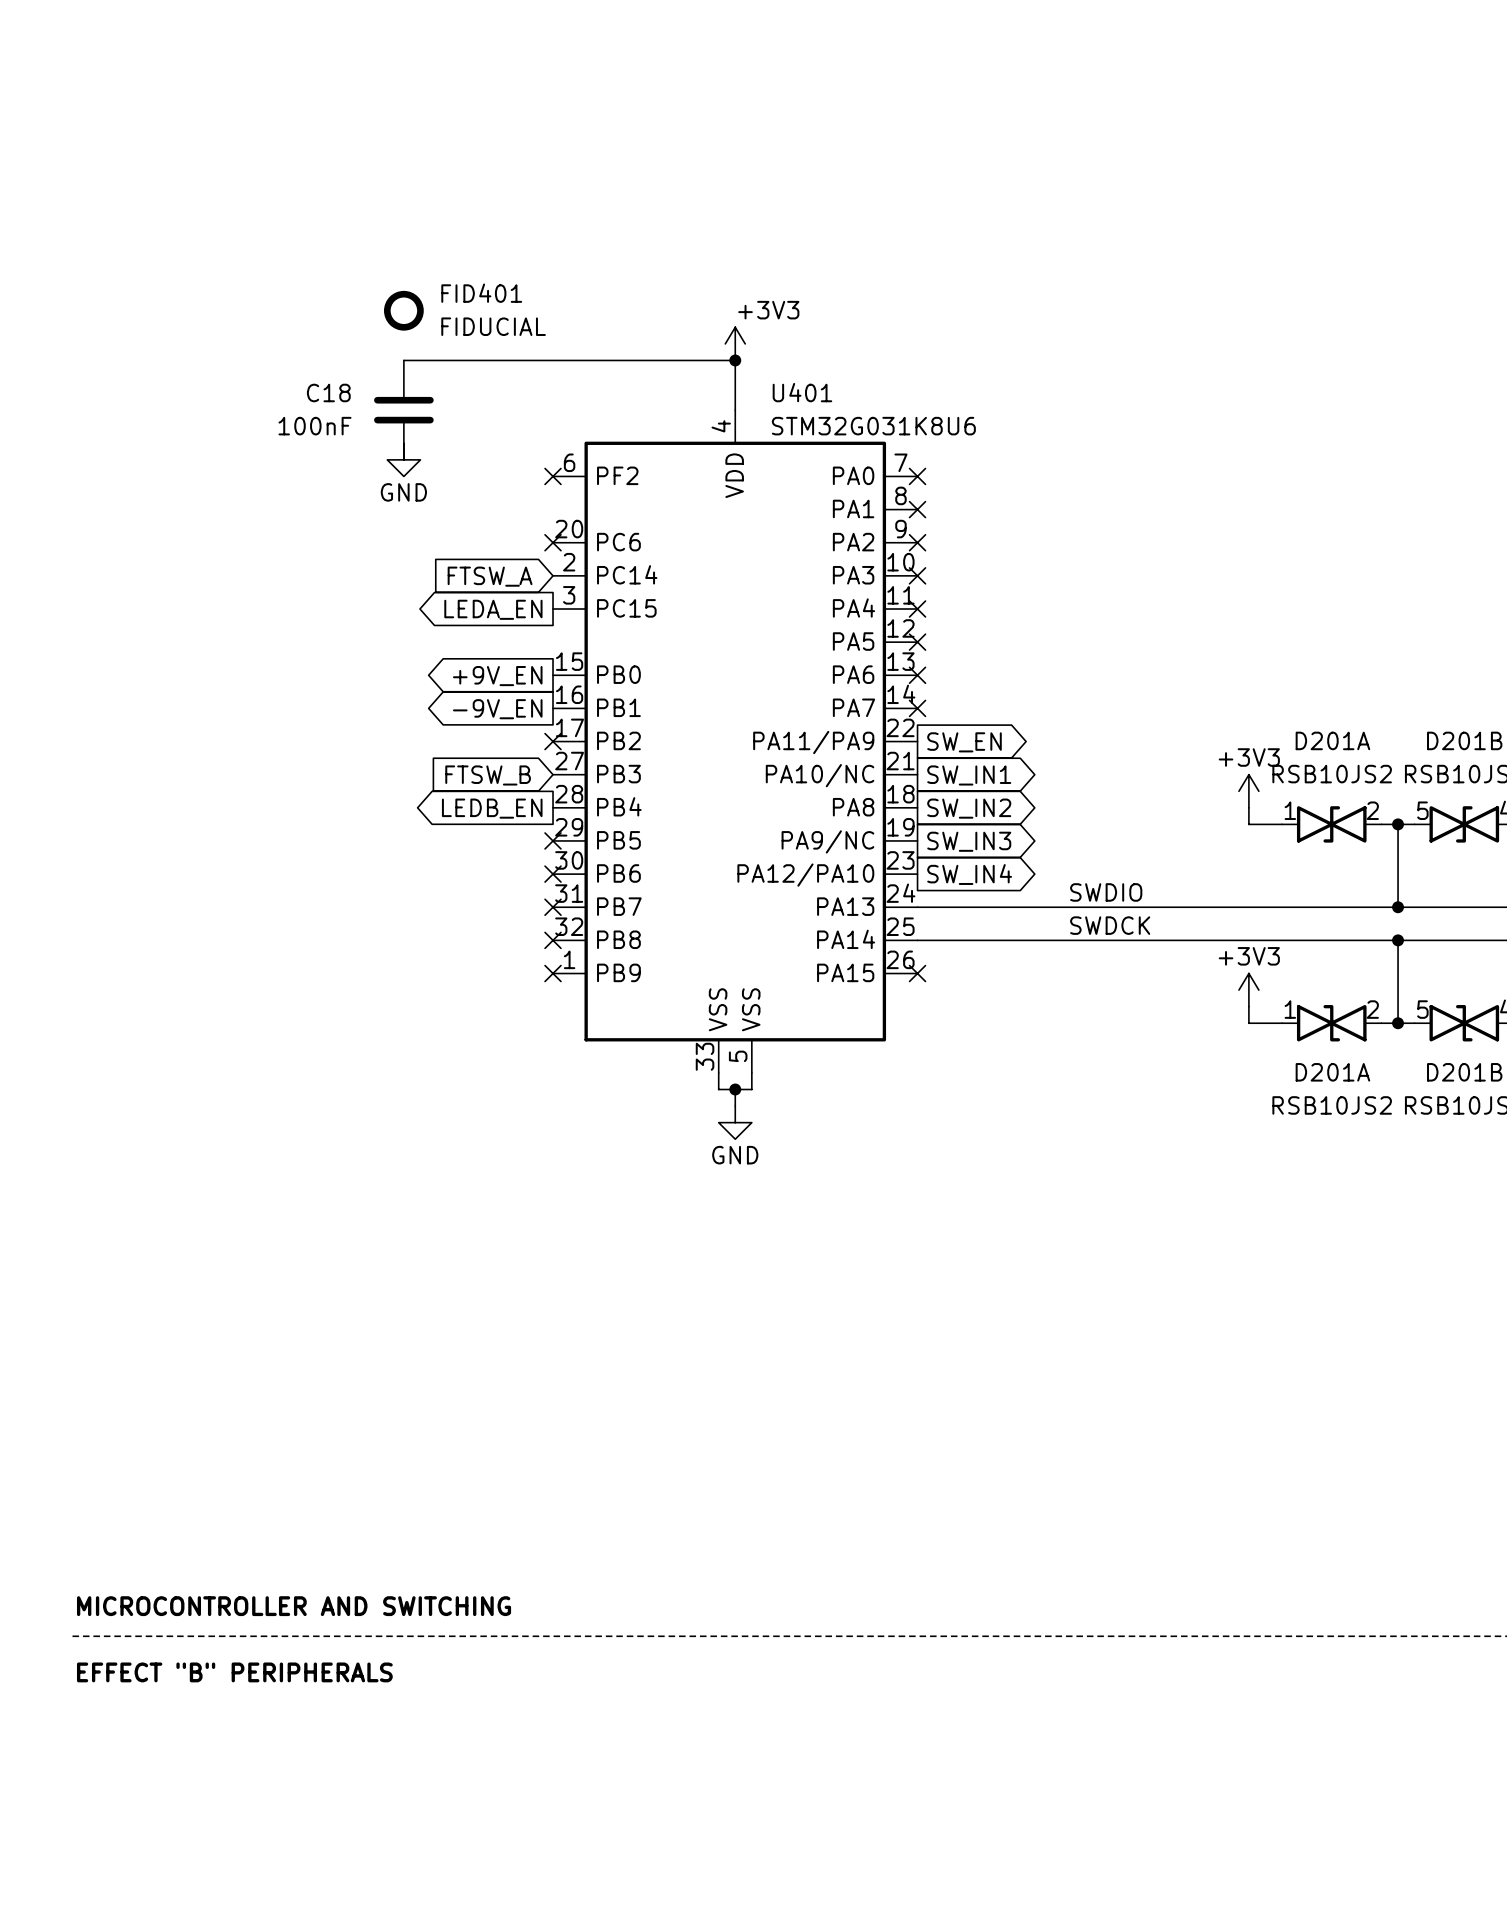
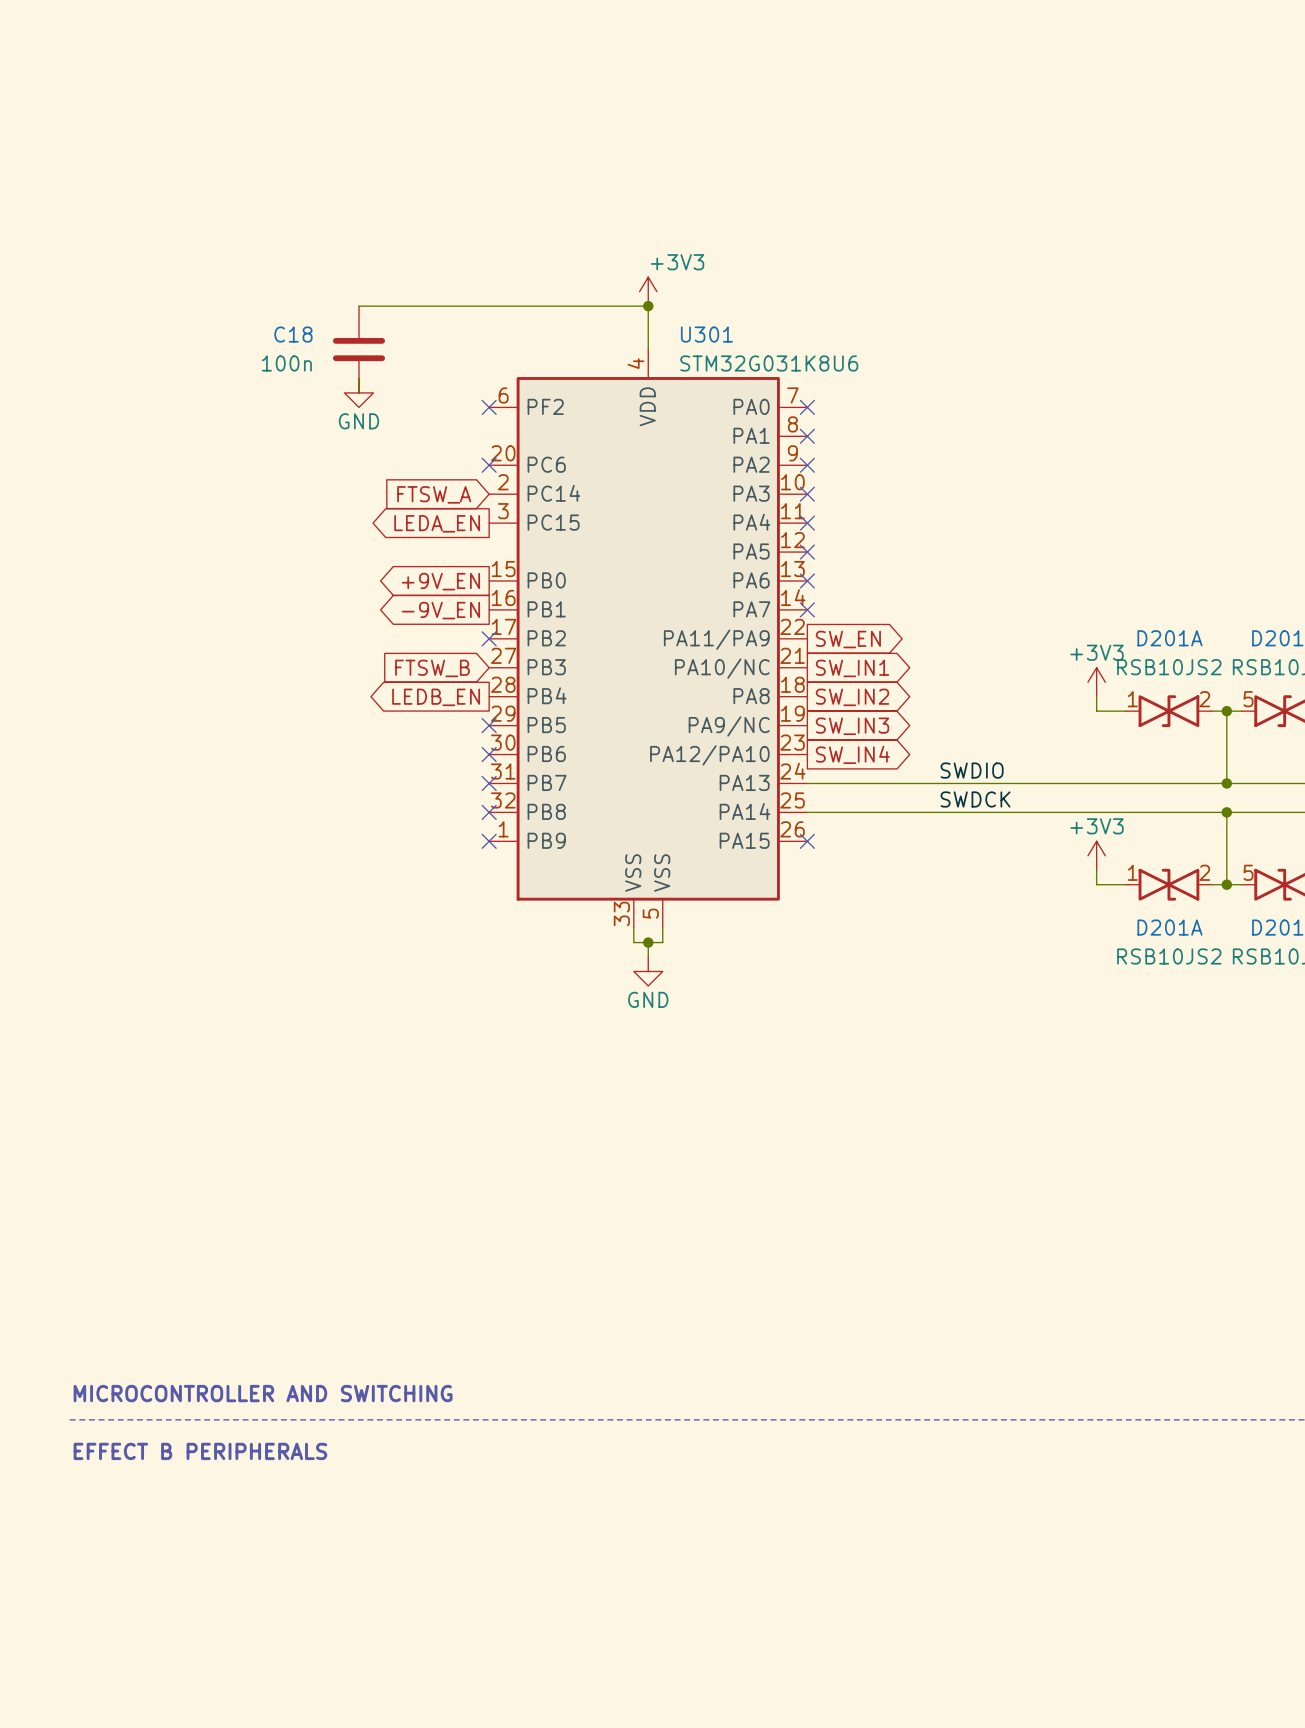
FID401: FIDUCIAL (403, 310) -> none
U401 name: U401 (802, 392) -> U301 (706, 334)
C18 value: 100nF (315, 426) -> 100n (286, 363)
text: EFFECT "B" PERIPHERALS (234, 1672) -> EFFECT B PERIPHERALS (200, 1451)

